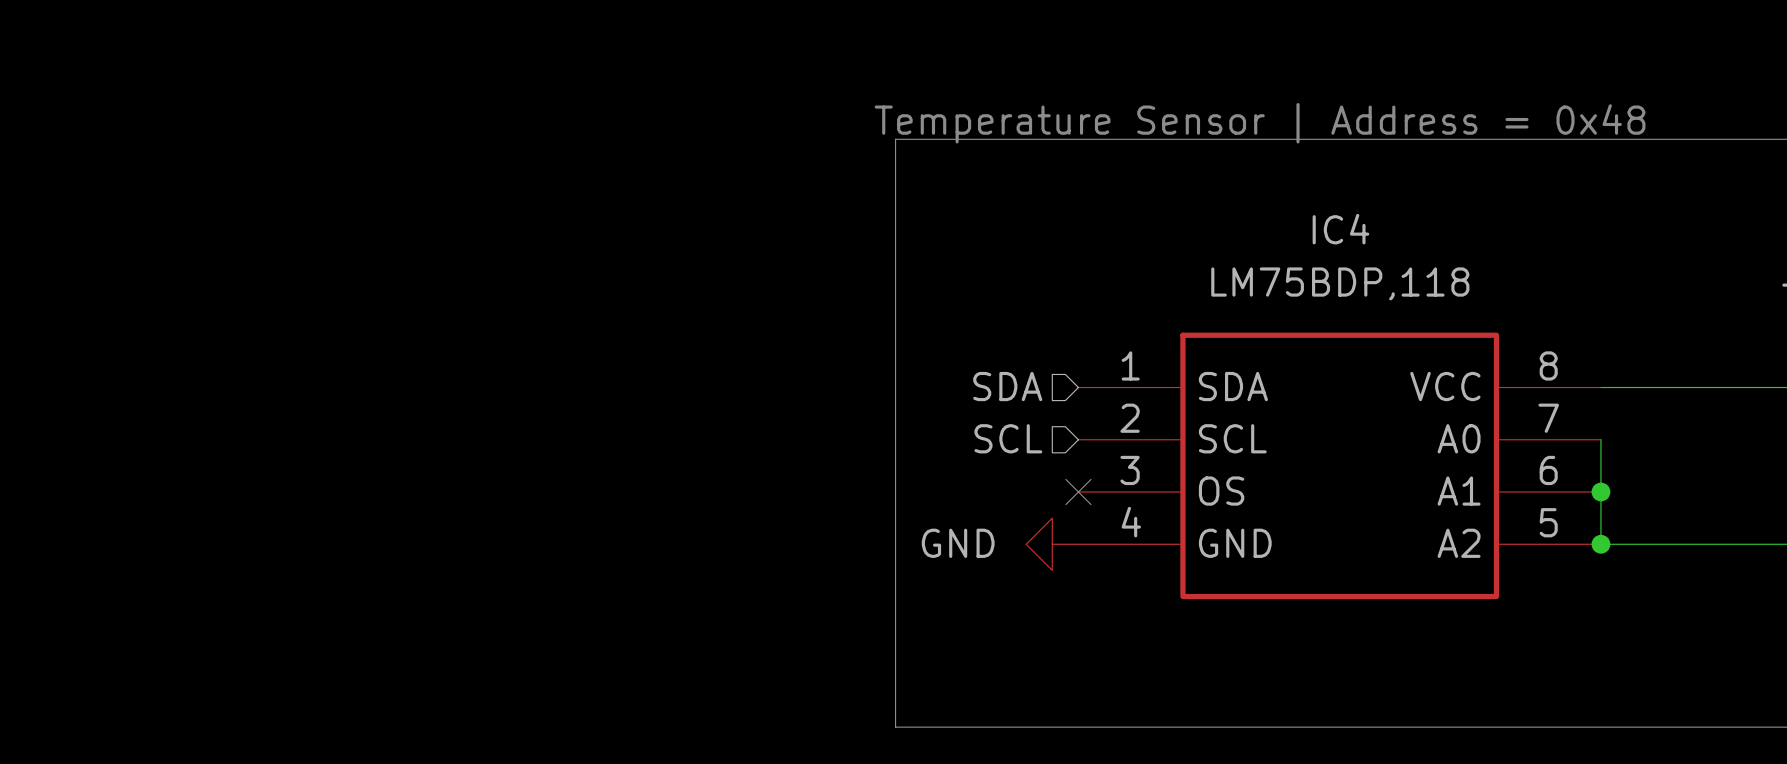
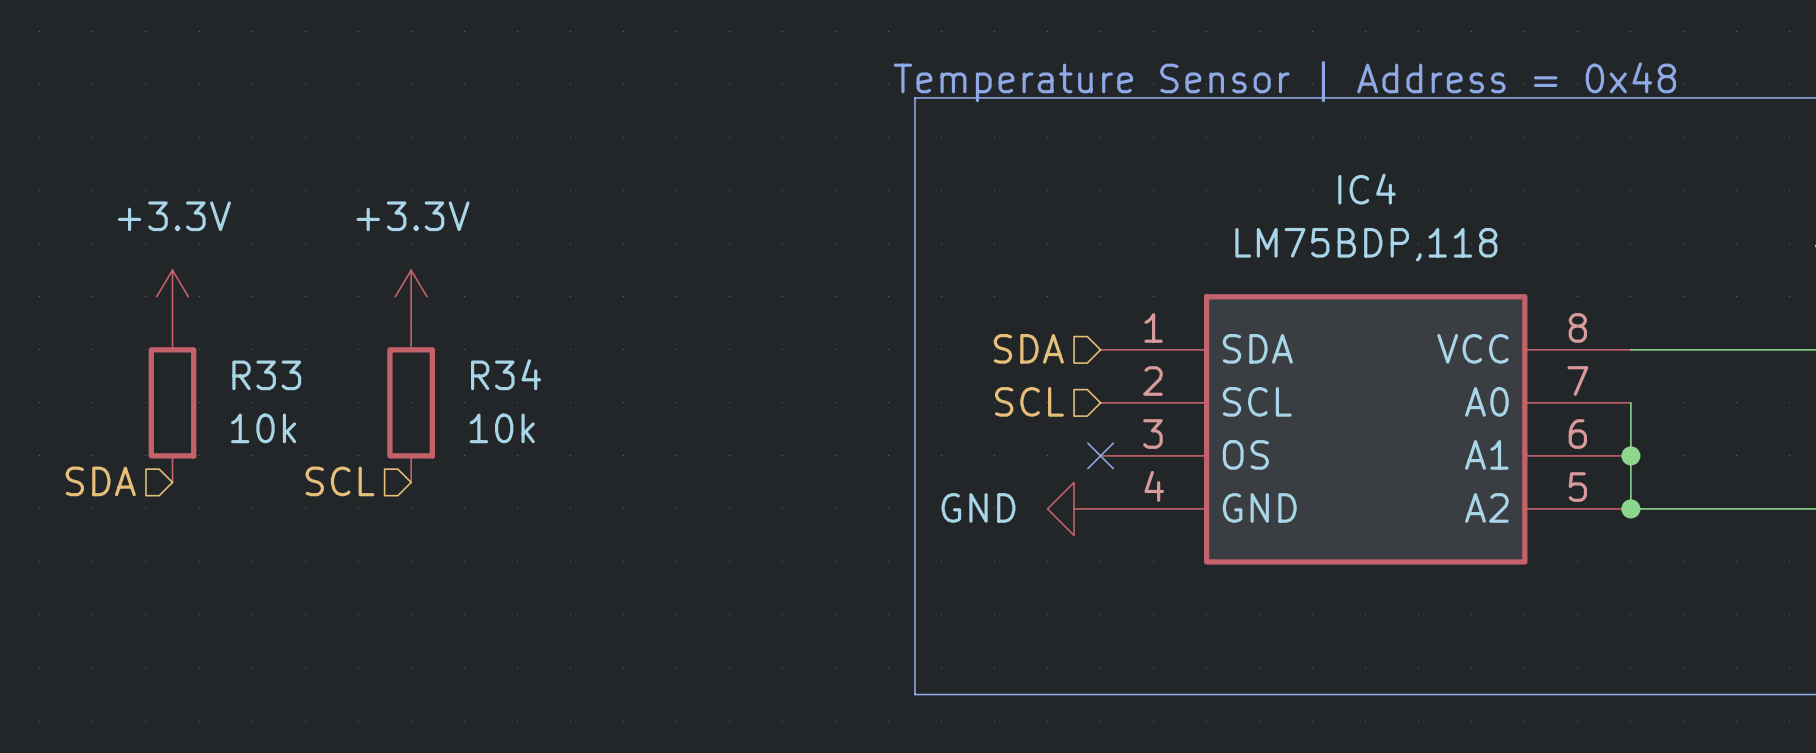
power symbol: none -> +3.3V (172, 296)
power symbol: none -> +3.3V (411, 296)
R33: none -> 10k (172, 402)
R34: none -> 10k (411, 402)
hierarchical label: none -> SDA (100, 481)
hierarchical label: none -> SCL (340, 481)

